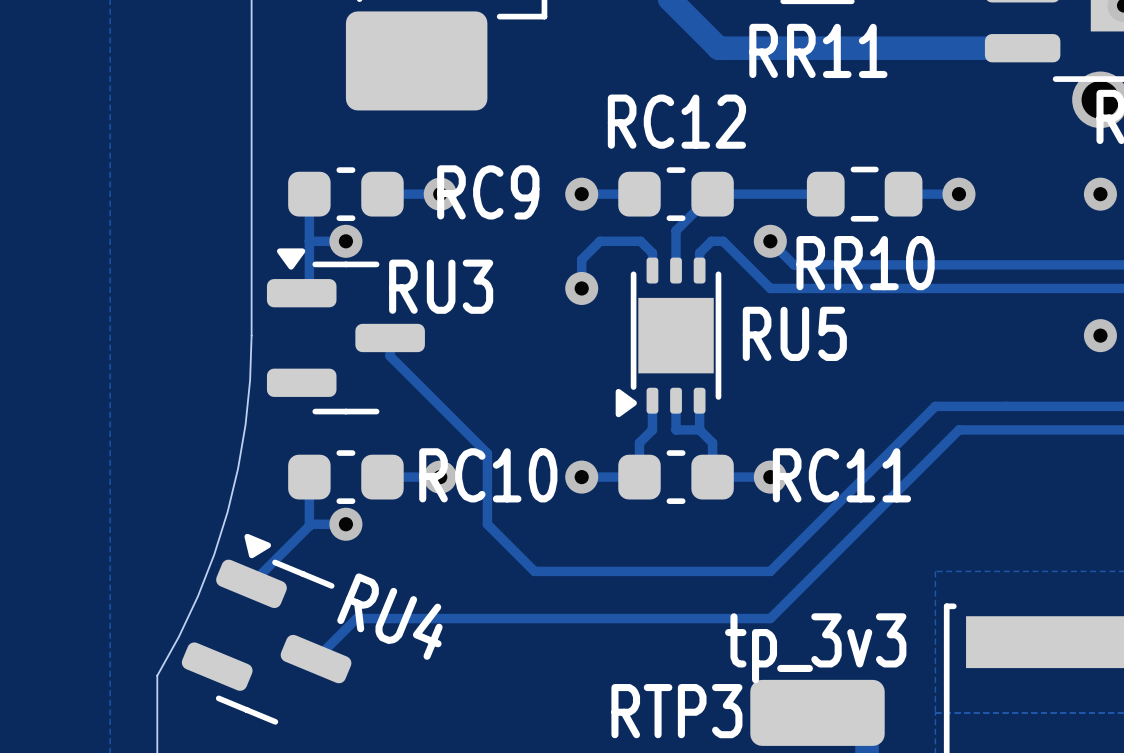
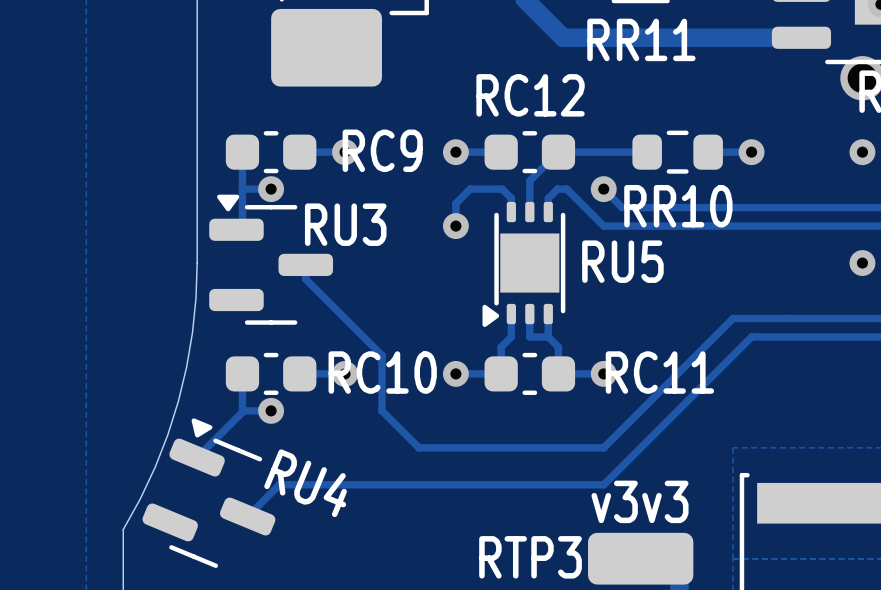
RTP3 value: tp_3v3 (815, 648) -> v3v3 (640, 501)

